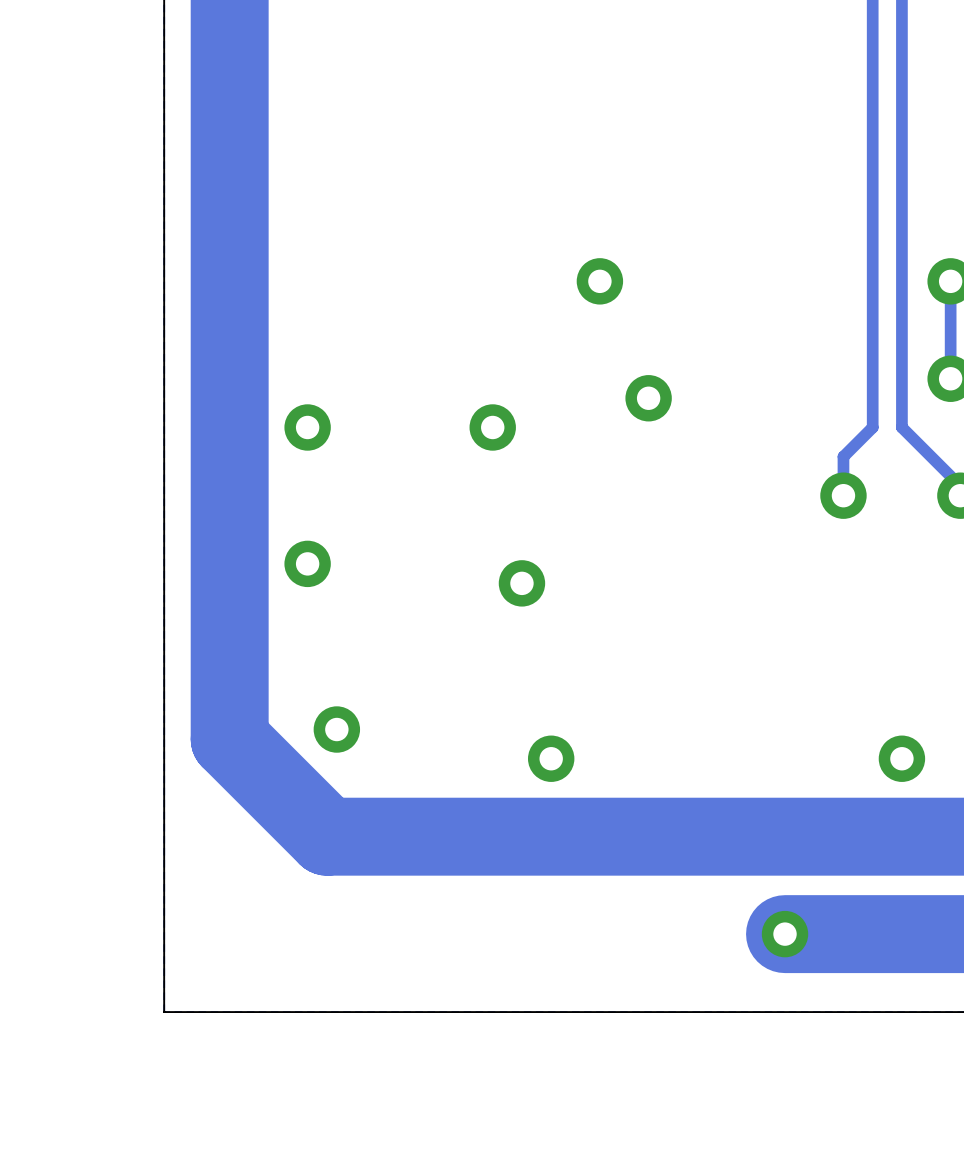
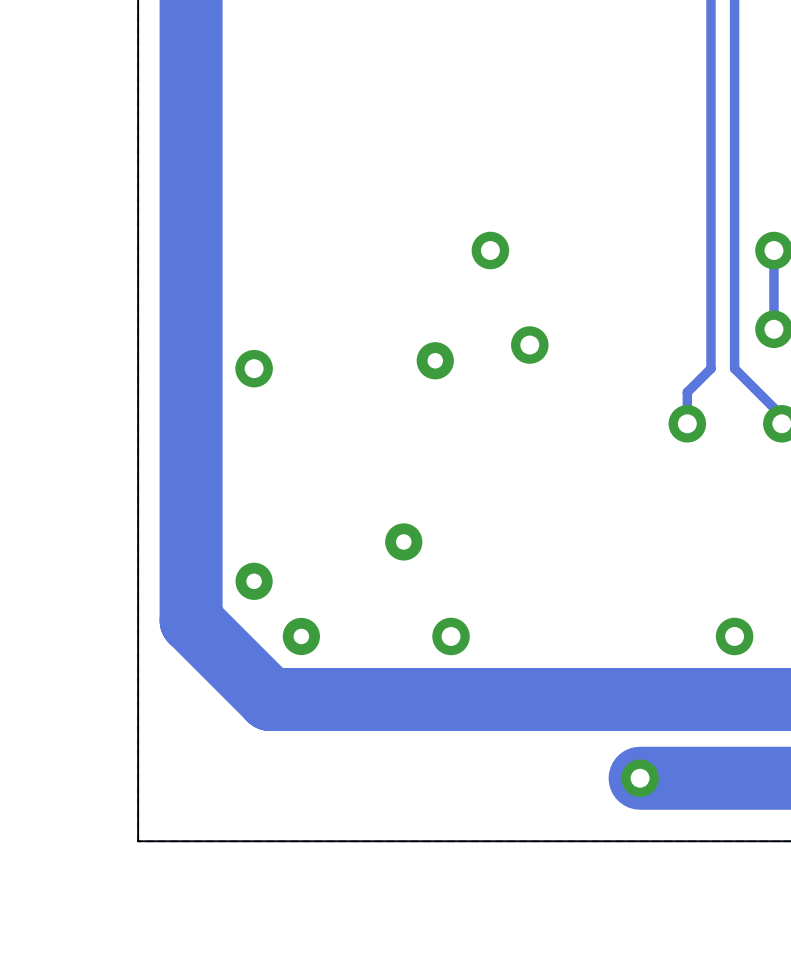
via position: (492, 427) -> (435, 360)
via: (307, 563) -> none
via: (521, 583) -> none
via: none -> (403, 541)
via: none -> (254, 581)
via: (336, 729) -> none
via: none -> (301, 636)

